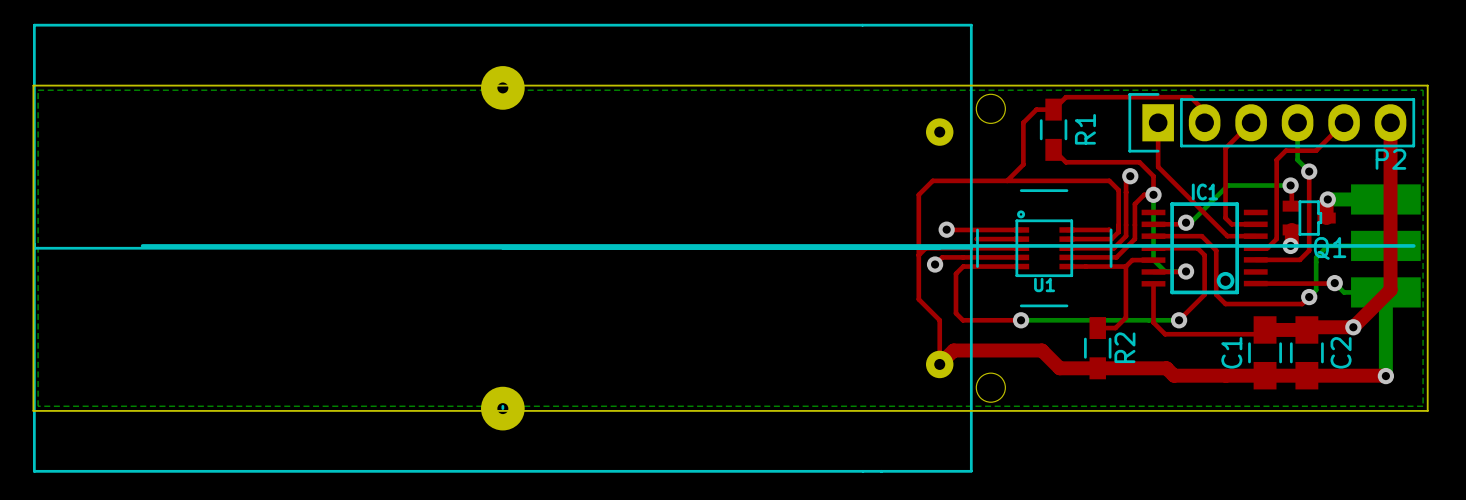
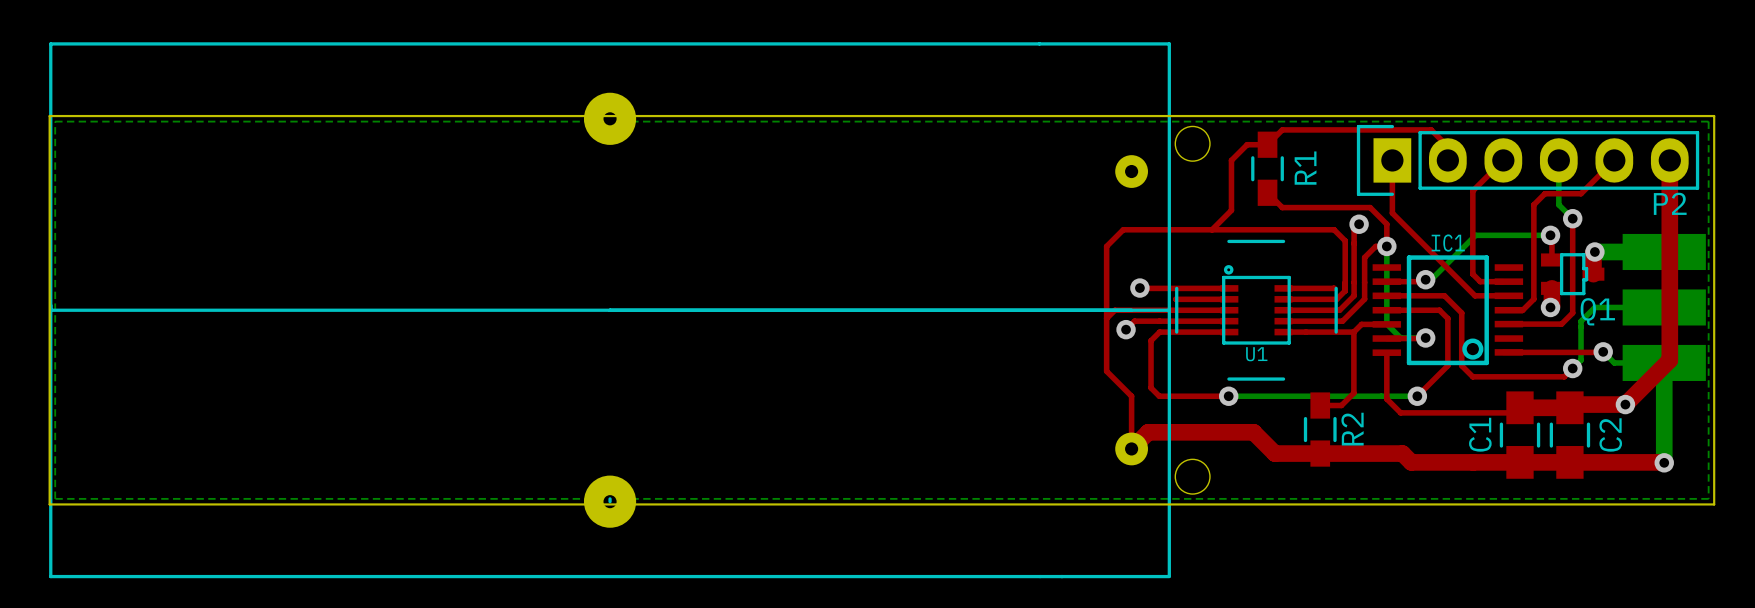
line: (142, 245) (1413, 245) -> none

